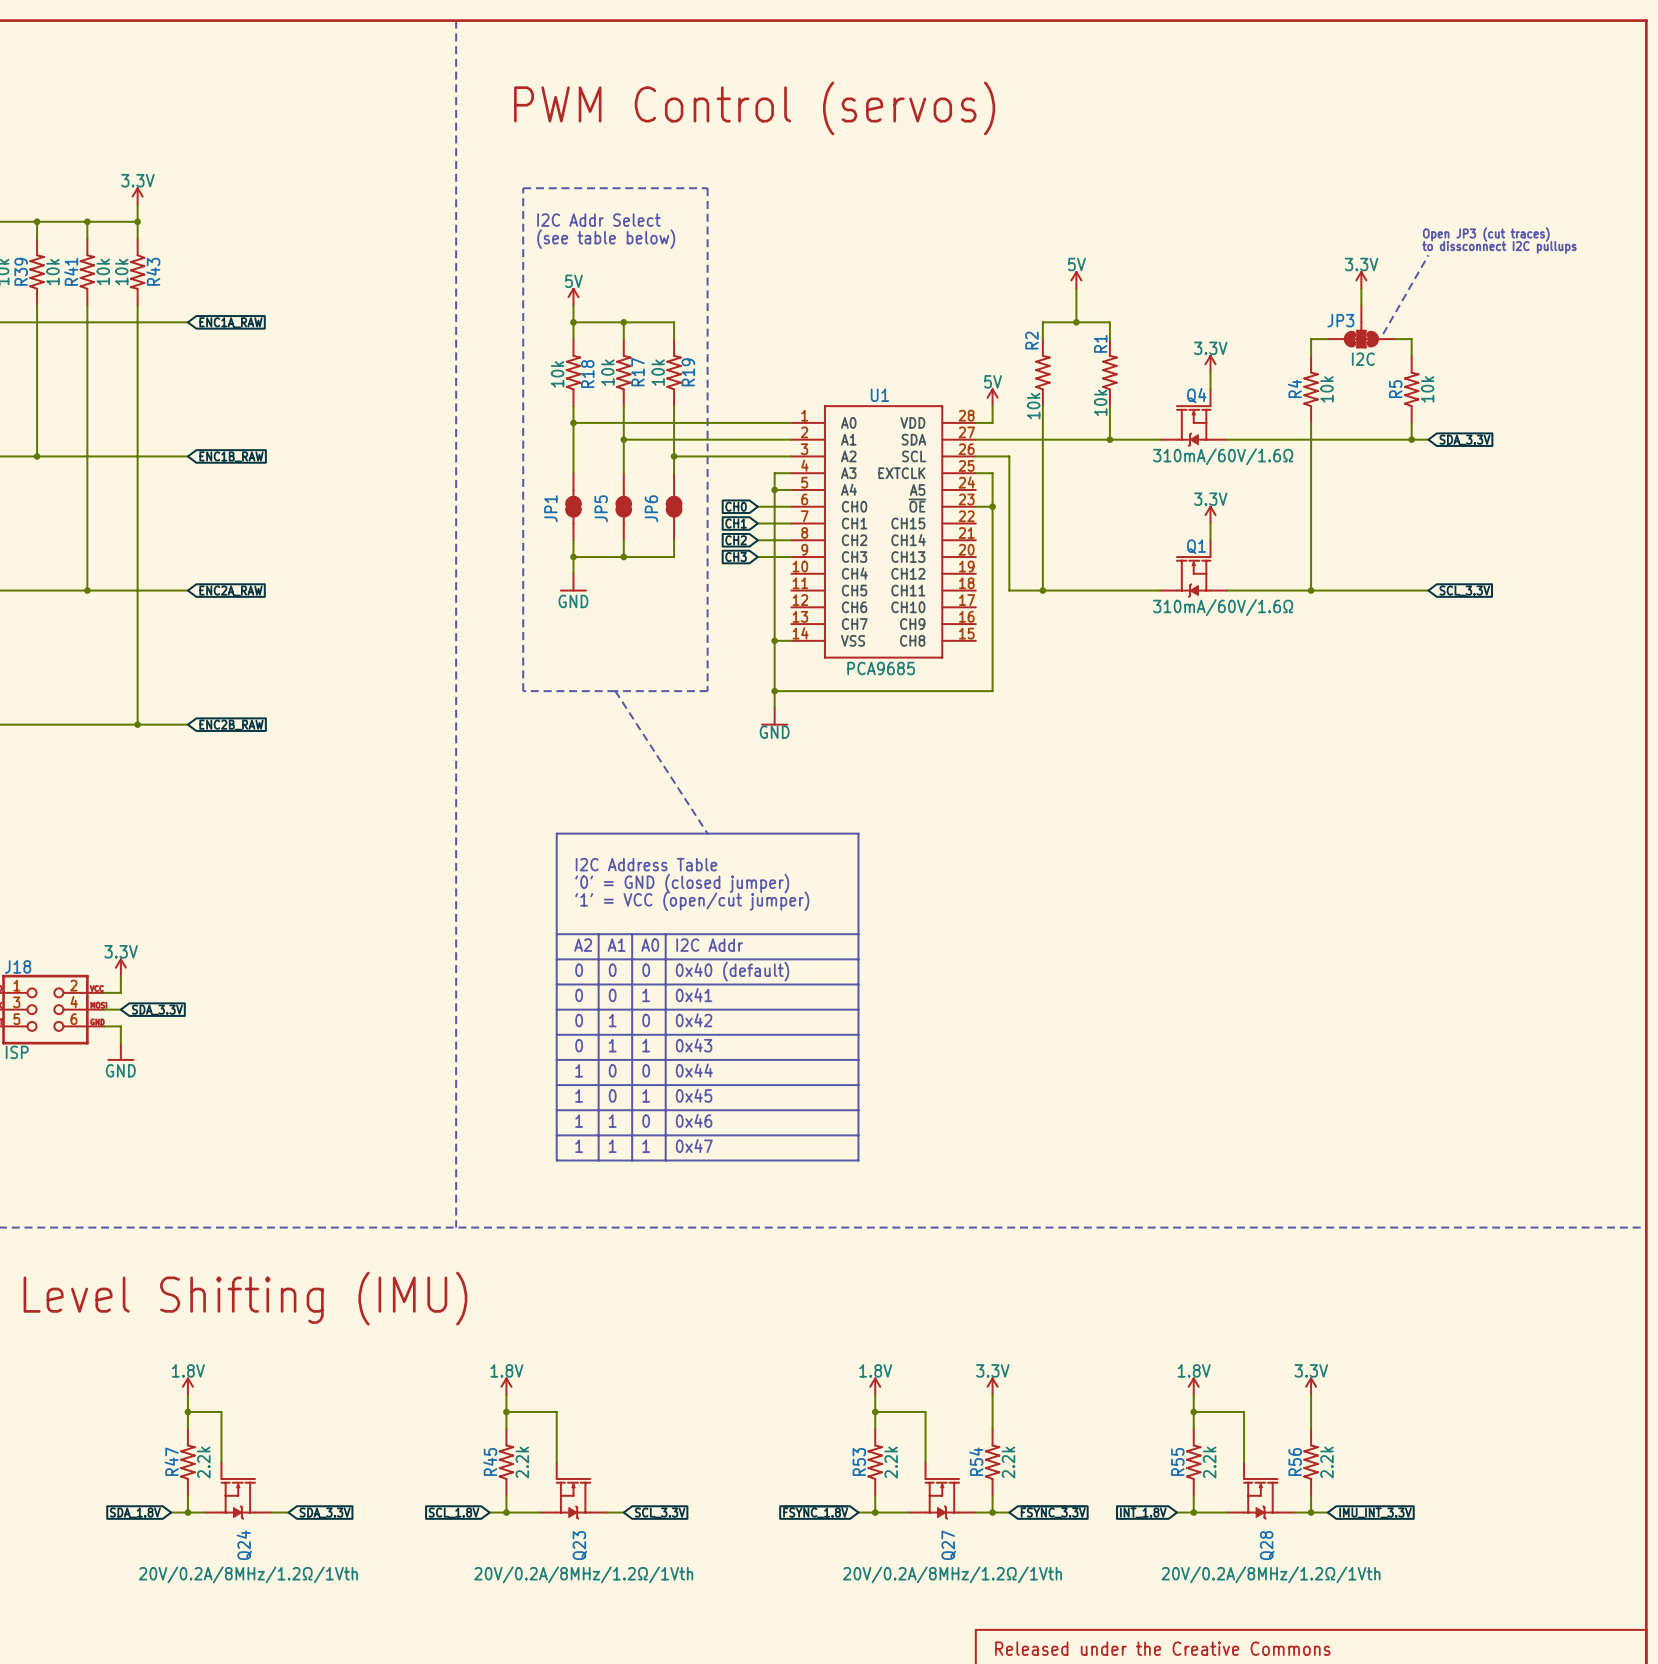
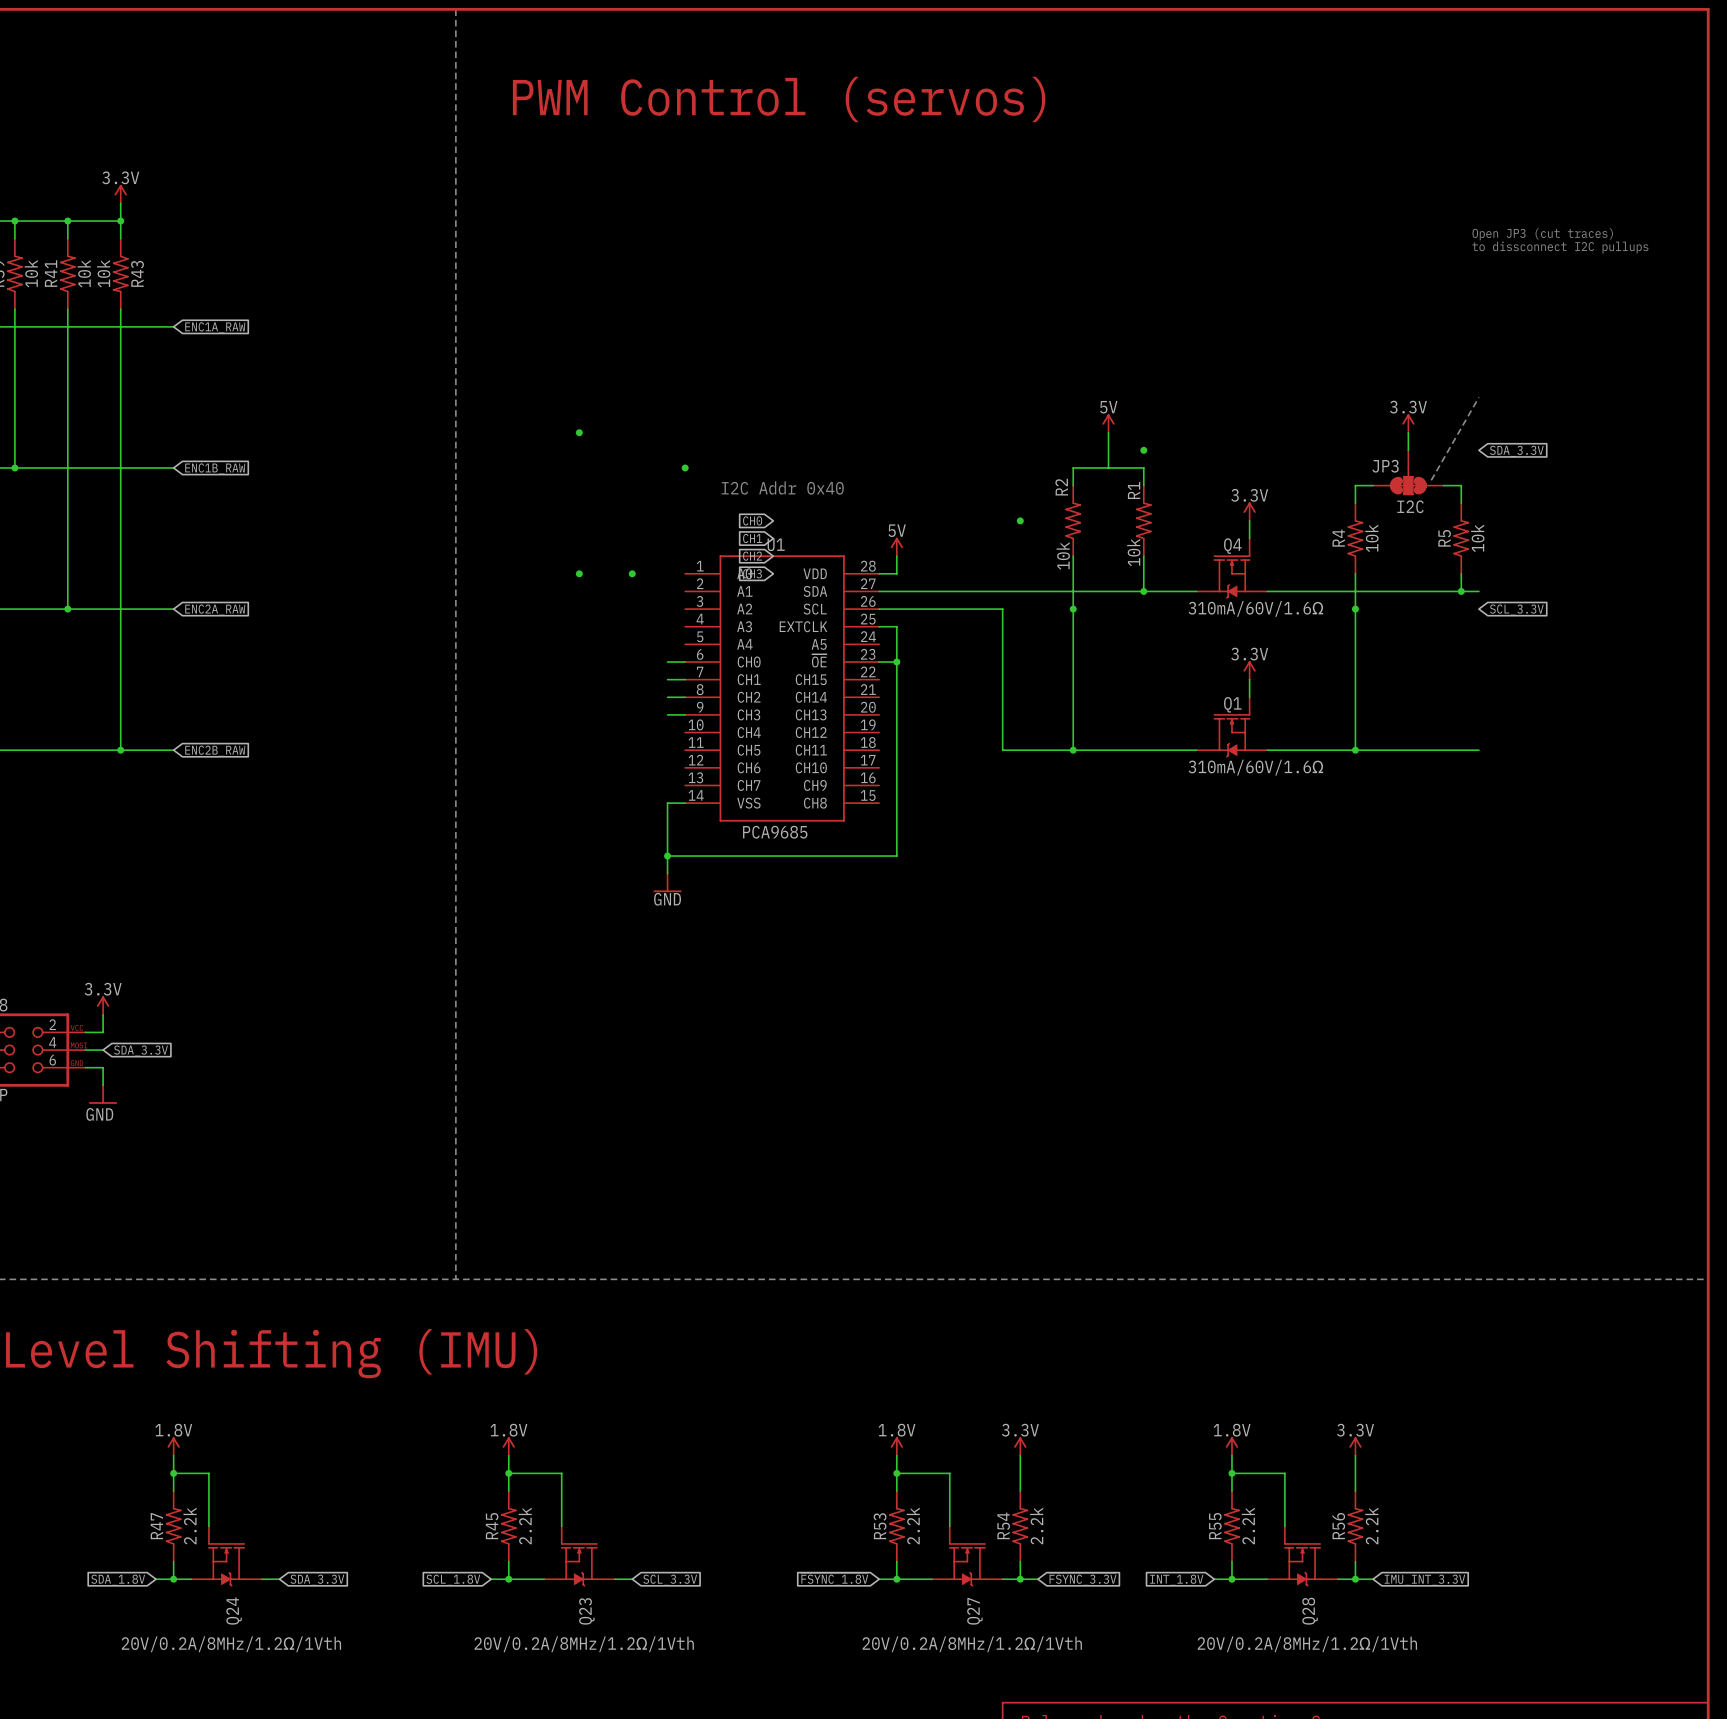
line: (523, 188) (523, 691) (707, 691) (707, 188) (523, 188) -> none
text: I2C Addr Select (598, 220) -> none
text: (see table below) (606, 239) -> none
line: (1428, 255) (1383, 334) -> (1478, 397) (1431, 480)
power symbol: 5V (1076, 280) -> none
power symbol: 3.3V (1361, 280) -> none
wire: (1076, 288) (1076, 322) -> (1108, 432) (1108, 467)
wire: (1361, 288) (1361, 305) -> (1408, 432) (1408, 450)
power symbol: 5V (573, 296) -> none
wire: (573, 305) (573, 339) -> none
wire: (573, 322) (674, 322) (674, 339) -> none
junction: (573, 322) -> none
wire: (623, 322) (623, 339) -> none
junction: (623, 322) -> none
junction: (1076, 322) -> none
JP3 position: (1361, 326) -> (1408, 472)
wire: (1042, 339) (1042, 322) (1109, 322) (1109, 339) -> none
wire: (1327, 339) (1311, 339) (1311, 355) -> none
wire: (1394, 339) (1411, 339) (1411, 355) -> (1443, 485) (1461, 485) (1461, 503)
power symbol: 3.3V (1210, 363) -> none
R18: 10k (573, 372) -> none
R17: 10k (623, 372) -> none
R19: 10k (674, 372) -> none
R2 position: (1042, 372) -> (1073, 520)
R1 position: (1109, 372) -> (1143, 520)
wire: (1210, 372) (1210, 389) -> none
R4 position: (1311, 389) -> (1355, 538)
R5 position: (1411, 389) -> (1461, 538)
power symbol: 5V (992, 397) -> none
wire: (573, 406) (573, 473) -> none
wire: (623, 406) (623, 473) -> none
wire: (674, 406) (674, 473) -> none
wire: (992, 406) (992, 422) (975, 422) -> none
wire: (1042, 406) (1042, 456) -> (1143, 485) (1143, 467) (1073, 467)
wire: (1109, 406) (1109, 439) -> (1143, 556) (1143, 591)
power symbol: none -> 5V (1108, 423)
power symbol: none -> 3.3V (1408, 423)
Q4 position: (1193, 417) -> (1231, 568)
wire: (573, 422) (791, 422) -> none
wire: (1311, 422) (1311, 473) -> (1373, 485) (1355, 485)
wire: (1411, 422) (1411, 439) -> (1461, 573) (1461, 591)
wire: (623, 439) (791, 439) -> none
junction: (623, 439) -> none
wire: (975, 439) (1160, 439) -> none
wire: (1227, 439) (1428, 439) -> (1267, 591) (1478, 591)
junction: (1411, 439) -> none
wire: (674, 456) (791, 456) -> none
wire: (975, 456) (1009, 456) (1009, 590) (1160, 590) -> none
wire: (791, 473) (774, 473) (774, 707) -> none
wire: (975, 473) (992, 473) (992, 691) (774, 691) -> none
text: none -> I2C Addr 0x40 (782, 487)
wire: (774, 489) (791, 489) -> none
junction: (774, 489) -> none
JP1: (573, 506) -> none
JP5: (623, 506) -> none
JP6: (674, 506) -> none
wire: (757, 506) (791, 506) -> none
wire: (975, 506) (992, 506) -> none
power symbol position: 3.3V (1210, 514) -> 3.3V (1249, 511)
wire: (757, 523) (791, 523) -> none
power symbol: none -> 5V (896, 546)
U1 position: (883, 531) -> (782, 688)
wire: (573, 540) (573, 573) -> none
wire: (623, 540) (623, 557) -> none
wire: (674, 540) (674, 557) (573, 557) -> none
wire: none -> (896, 556) (896, 573) (879, 573)
wire: (757, 557) (791, 557) -> none
Q1 position: (1193, 568) -> (1231, 727)
wire: none -> (879, 591) (1196, 591)
junction: none -> (1143, 591)
junction: none -> (1461, 591)
power symbol: GND (573, 582) -> none
wire: none -> (879, 609) (1002, 609) (1002, 750) (1196, 750)
wire: none -> (1073, 609) (1073, 750)
wire: (1227, 590) (1428, 590) -> (1267, 750) (1478, 750)
wire: none -> (1355, 609) (1355, 750)
wire: none -> (879, 626) (896, 626) (896, 856) (667, 856)
wire: none -> (667, 662) (685, 662)
wire: (774, 640) (791, 640) -> (879, 662) (896, 662)
junction: (774, 640) -> none
junction: none -> (896, 662)
power symbol: none -> 3.3V (1249, 670)
wire: none -> (667, 679) (685, 679)
wire: none -> (1249, 679) (1249, 697)
wire: none -> (667, 697) (685, 697)
line: (615, 691) (707, 833) -> none
junction: (774, 691) -> none
power symbol: GND (774, 716) -> none
junction: none -> (1073, 750)
junction: none -> (1355, 750)
wire: none -> (685, 803) (667, 803) (667, 873)
junction: none -> (667, 856)
line: (556, 833) (858, 833) (858, 1160) (556, 1160) (556, 833) -> none
power symbol: none -> GND (667, 882)
text: I2C Address Table (646, 864) -> none
text: '0' = GND (closed jumper) (682, 883) -> none
text: '1' = VCC (open/cut jumper) (692, 901) -> none
line: (556, 934) (858, 934) -> none
line: (598, 934) (598, 1160) -> none
line: (632, 934) (632, 1160) -> none
line: (665, 934) (665, 1160) -> none
text: A2 (583, 945) -> none
text: A1 (616, 945) -> none
text: A0 (650, 945) -> none
text: I2C Addr (709, 945) -> none
line: (556, 959) (858, 959) -> none
text: 0 (579, 970) -> none
text: 0 (612, 970) -> none
text: 0 (646, 970) -> none
text: 0x40 (default) (732, 971) -> none
line: (556, 984) (858, 984) -> none
text: 0 (579, 995) -> none
text: 0 (612, 995) -> none
text: 1 (646, 995) -> none
text: 0x41 (694, 995) -> none
line: (556, 1009) (858, 1009) -> none
text: 0 (579, 1020) -> none
text: 1 (612, 1020) -> none
text: 0 (646, 1020) -> none
text: 0x42 (694, 1020) -> none
line: (556, 1034) (858, 1034) -> none
text: 0 (579, 1045) -> none
text: 1 (612, 1045) -> none
text: 1 (646, 1045) -> none
text: 0x43 (694, 1045) -> none
line: (556, 1059) (858, 1059) -> none
text: 1 (579, 1070) -> none
text: 0 (612, 1070) -> none
text: 0 (646, 1070) -> none
text: 0x44 (694, 1070) -> none
line: (556, 1085) (858, 1085) -> none
text: 1 (579, 1095) -> none
text: 0 (612, 1095) -> none
text: 1 (646, 1095) -> none
text: 0x45 (694, 1095) -> none
line: (556, 1110) (858, 1110) -> none
text: 0x46 (694, 1120) -> none
text: 1 (579, 1121) -> none
text: 1 (612, 1121) -> none
text: 0 (646, 1121) -> none
line: (556, 1135) (858, 1135) -> none
text: 0x47 (694, 1145) -> none
text: 1 (579, 1146) -> none
text: 1 (612, 1146) -> none
text: 1 (646, 1146) -> none

